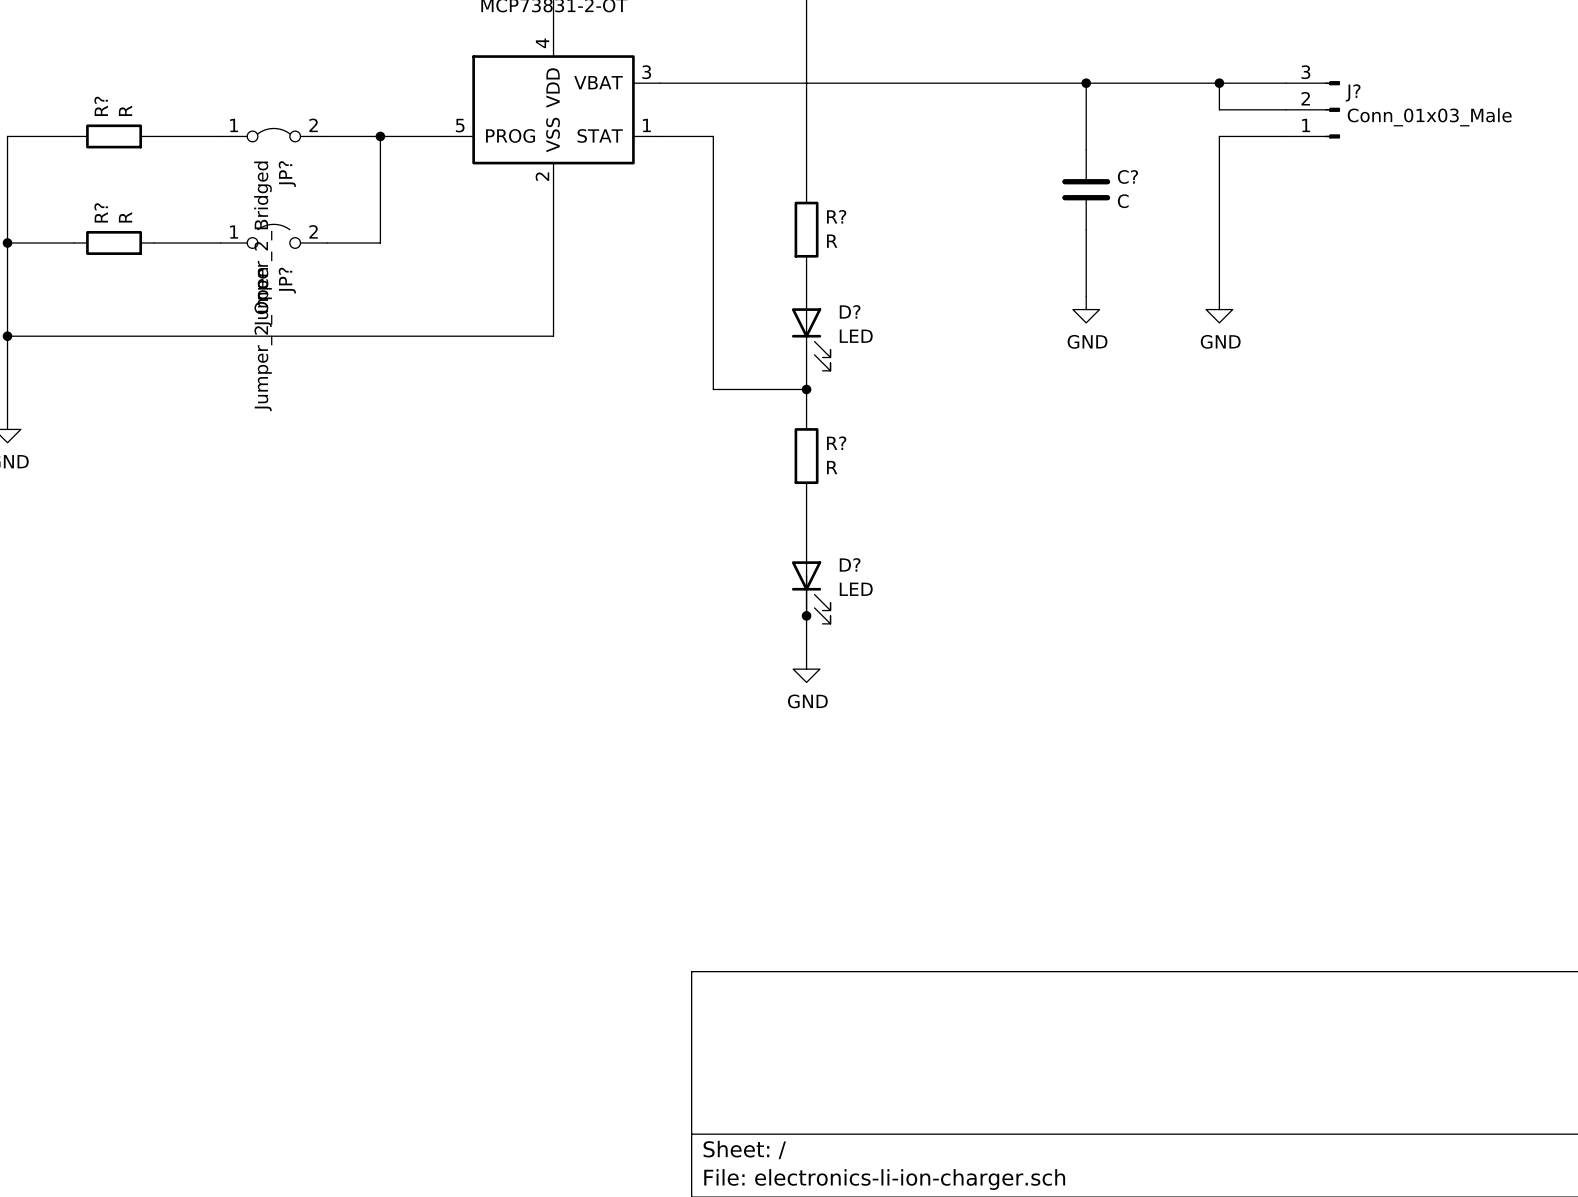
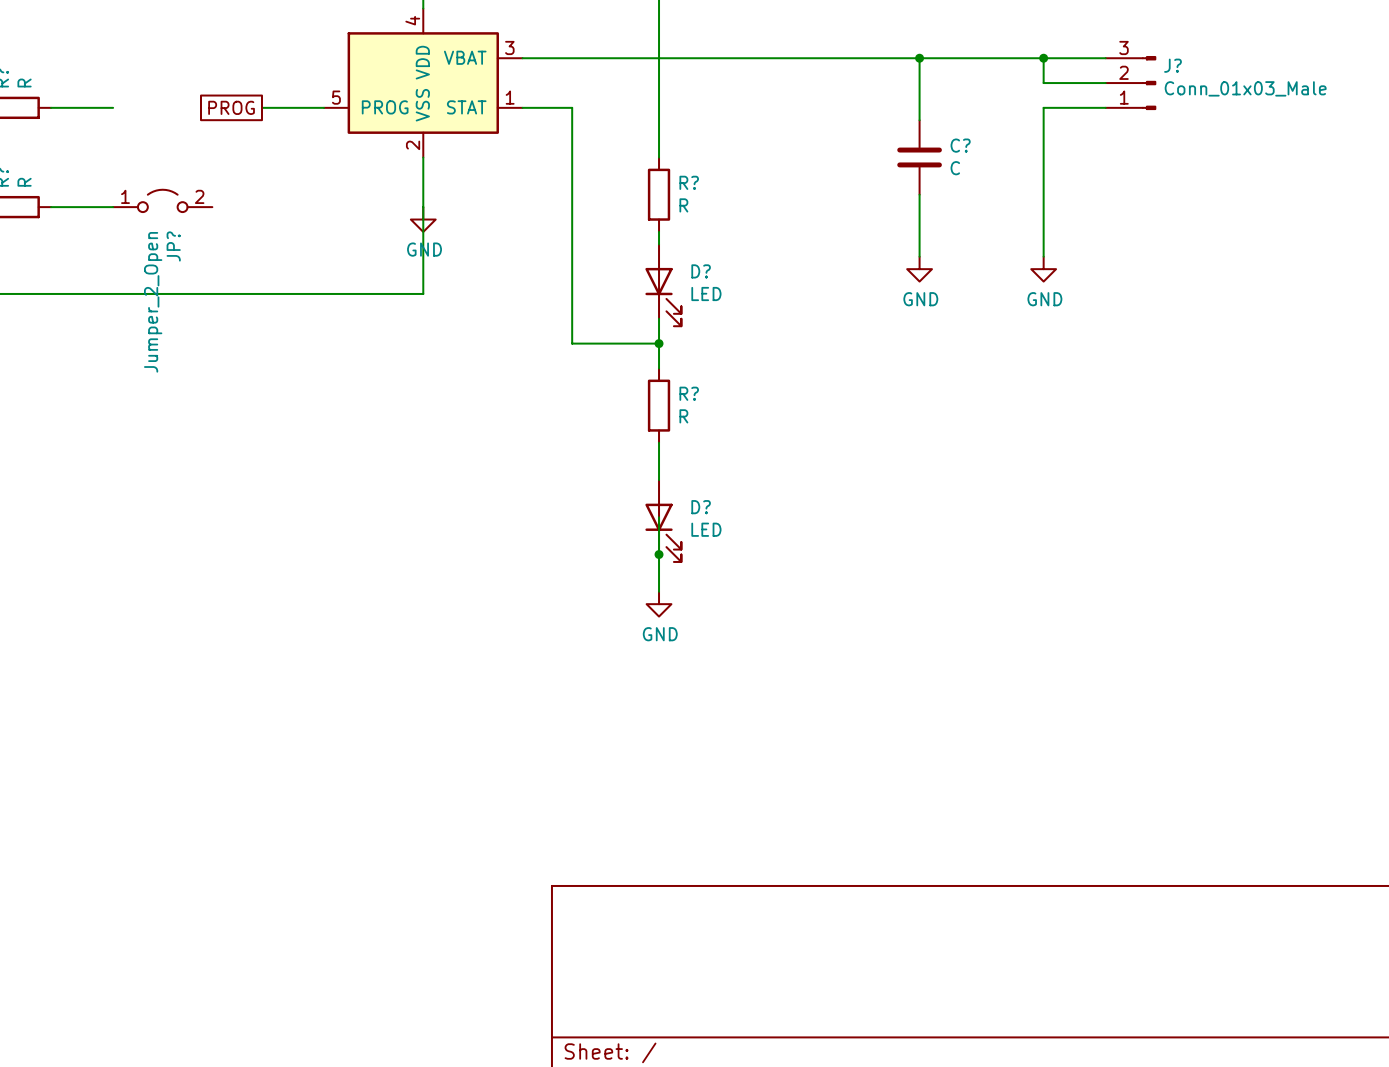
JP?: Jumper_2_Bridged (273, 135) -> none
wire: (327, 136) (380, 136) (380, 242) (327, 242) -> none
global label: none -> PROG (231, 107)
junction: (380, 136) -> none
power symbol: none -> GND (423, 219)

